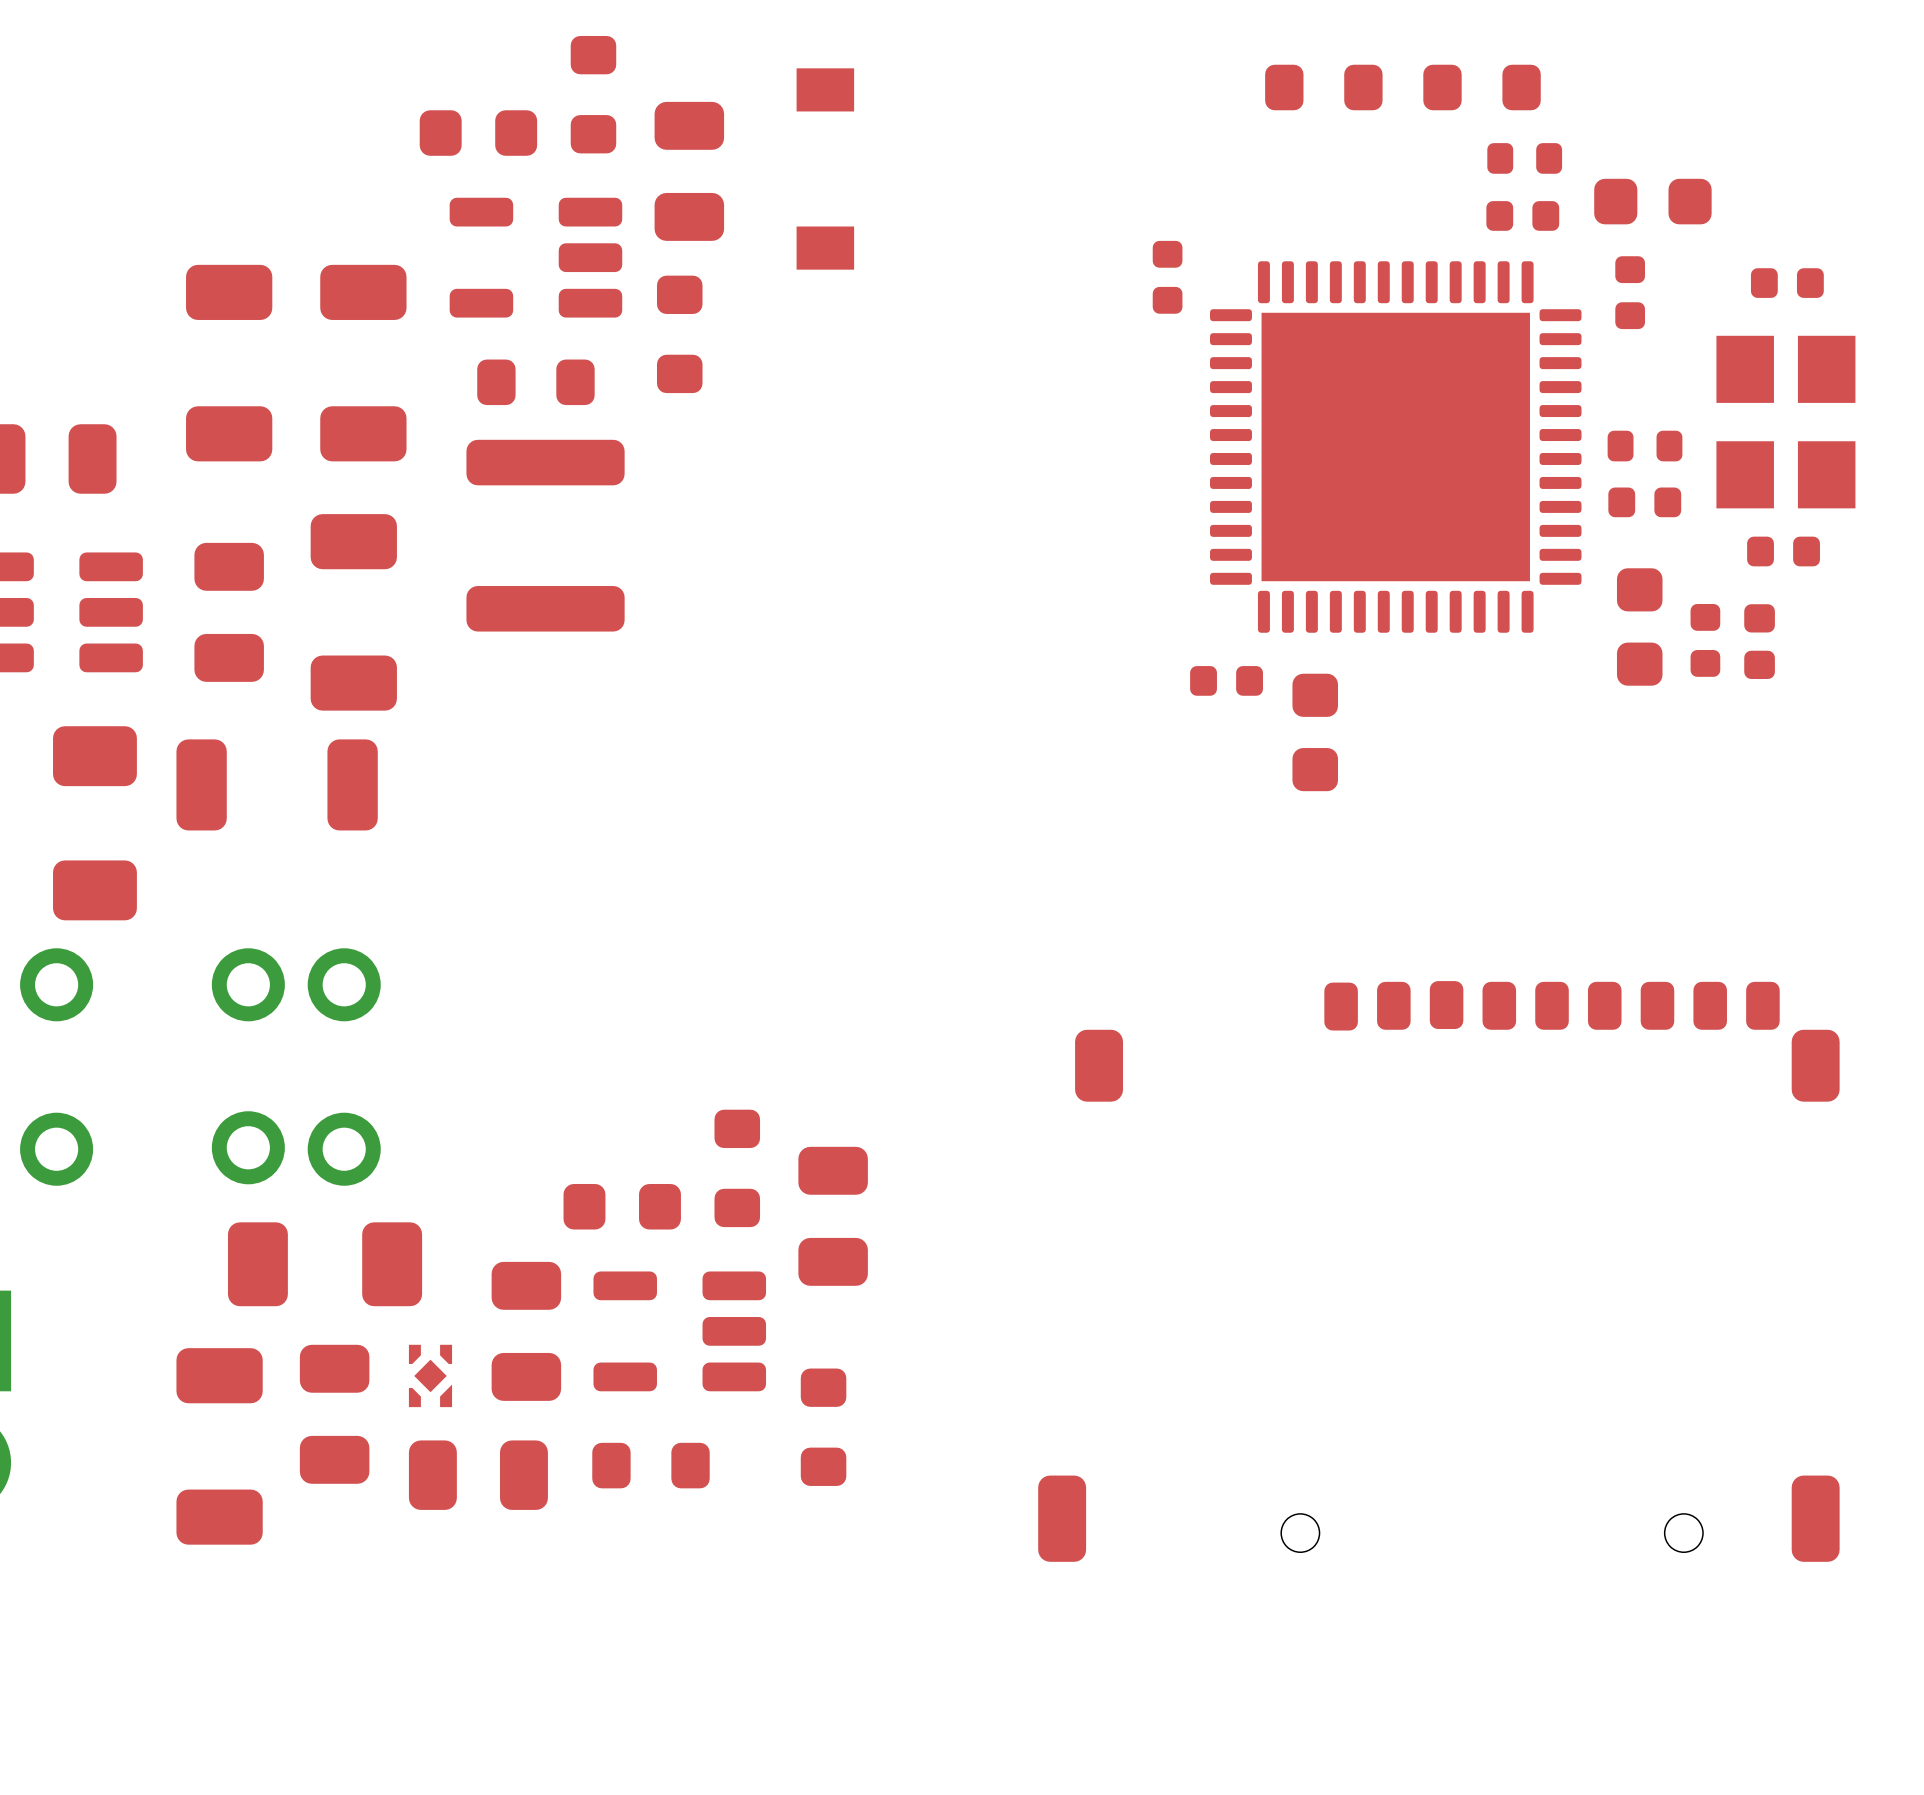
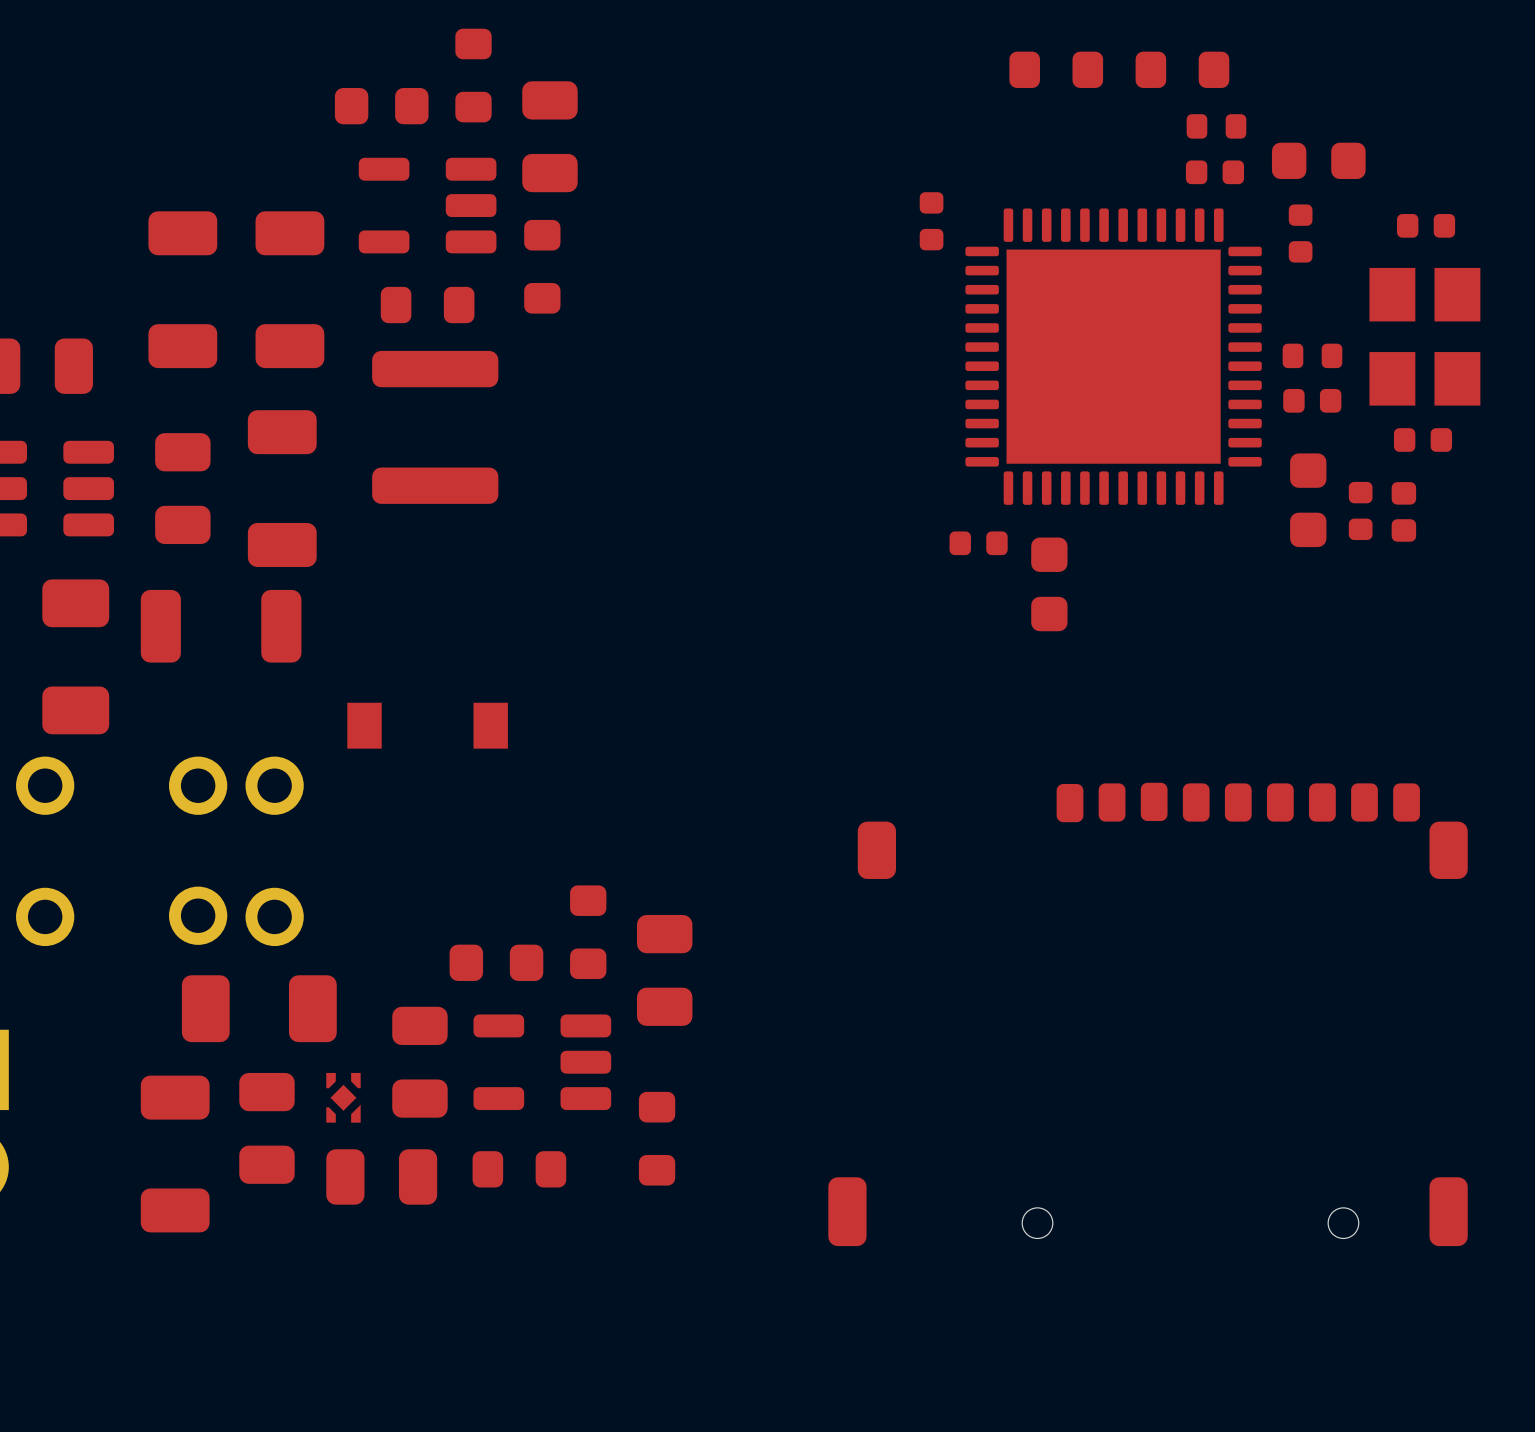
part rotation: 0° (825, 168) -> 90° clockwise (427, 725)
part position: (825, 168) -> (427, 725)

